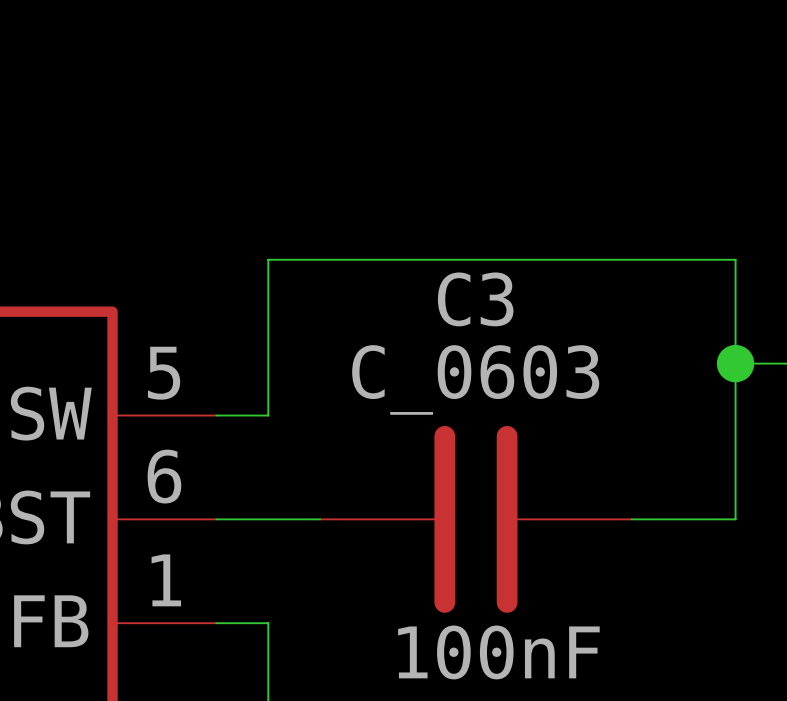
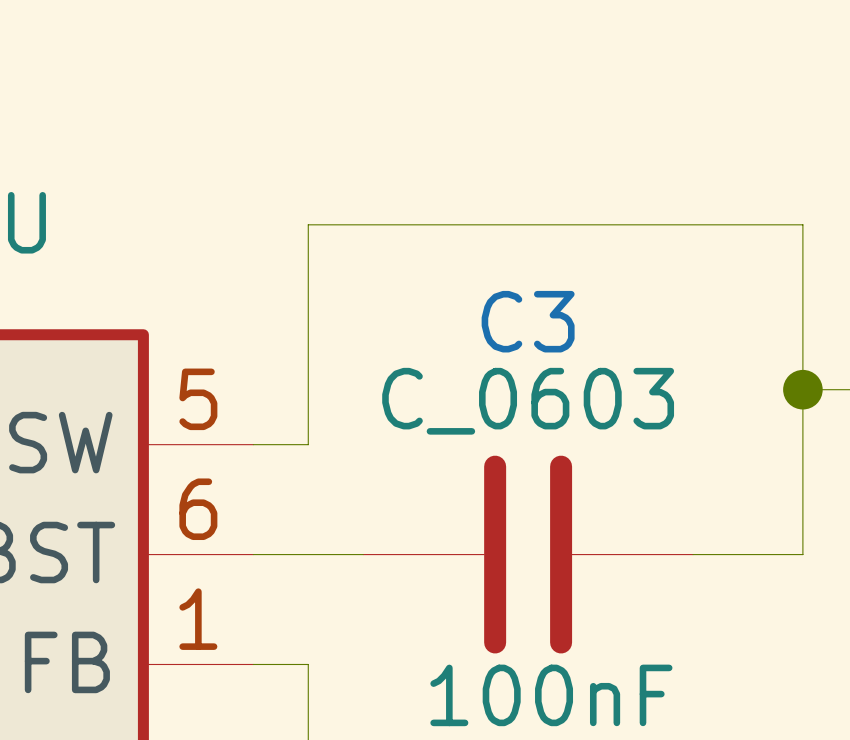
wire: (268, 259) (735, 259) -> (308, 279) (308, 224) (802, 224) (802, 279)

